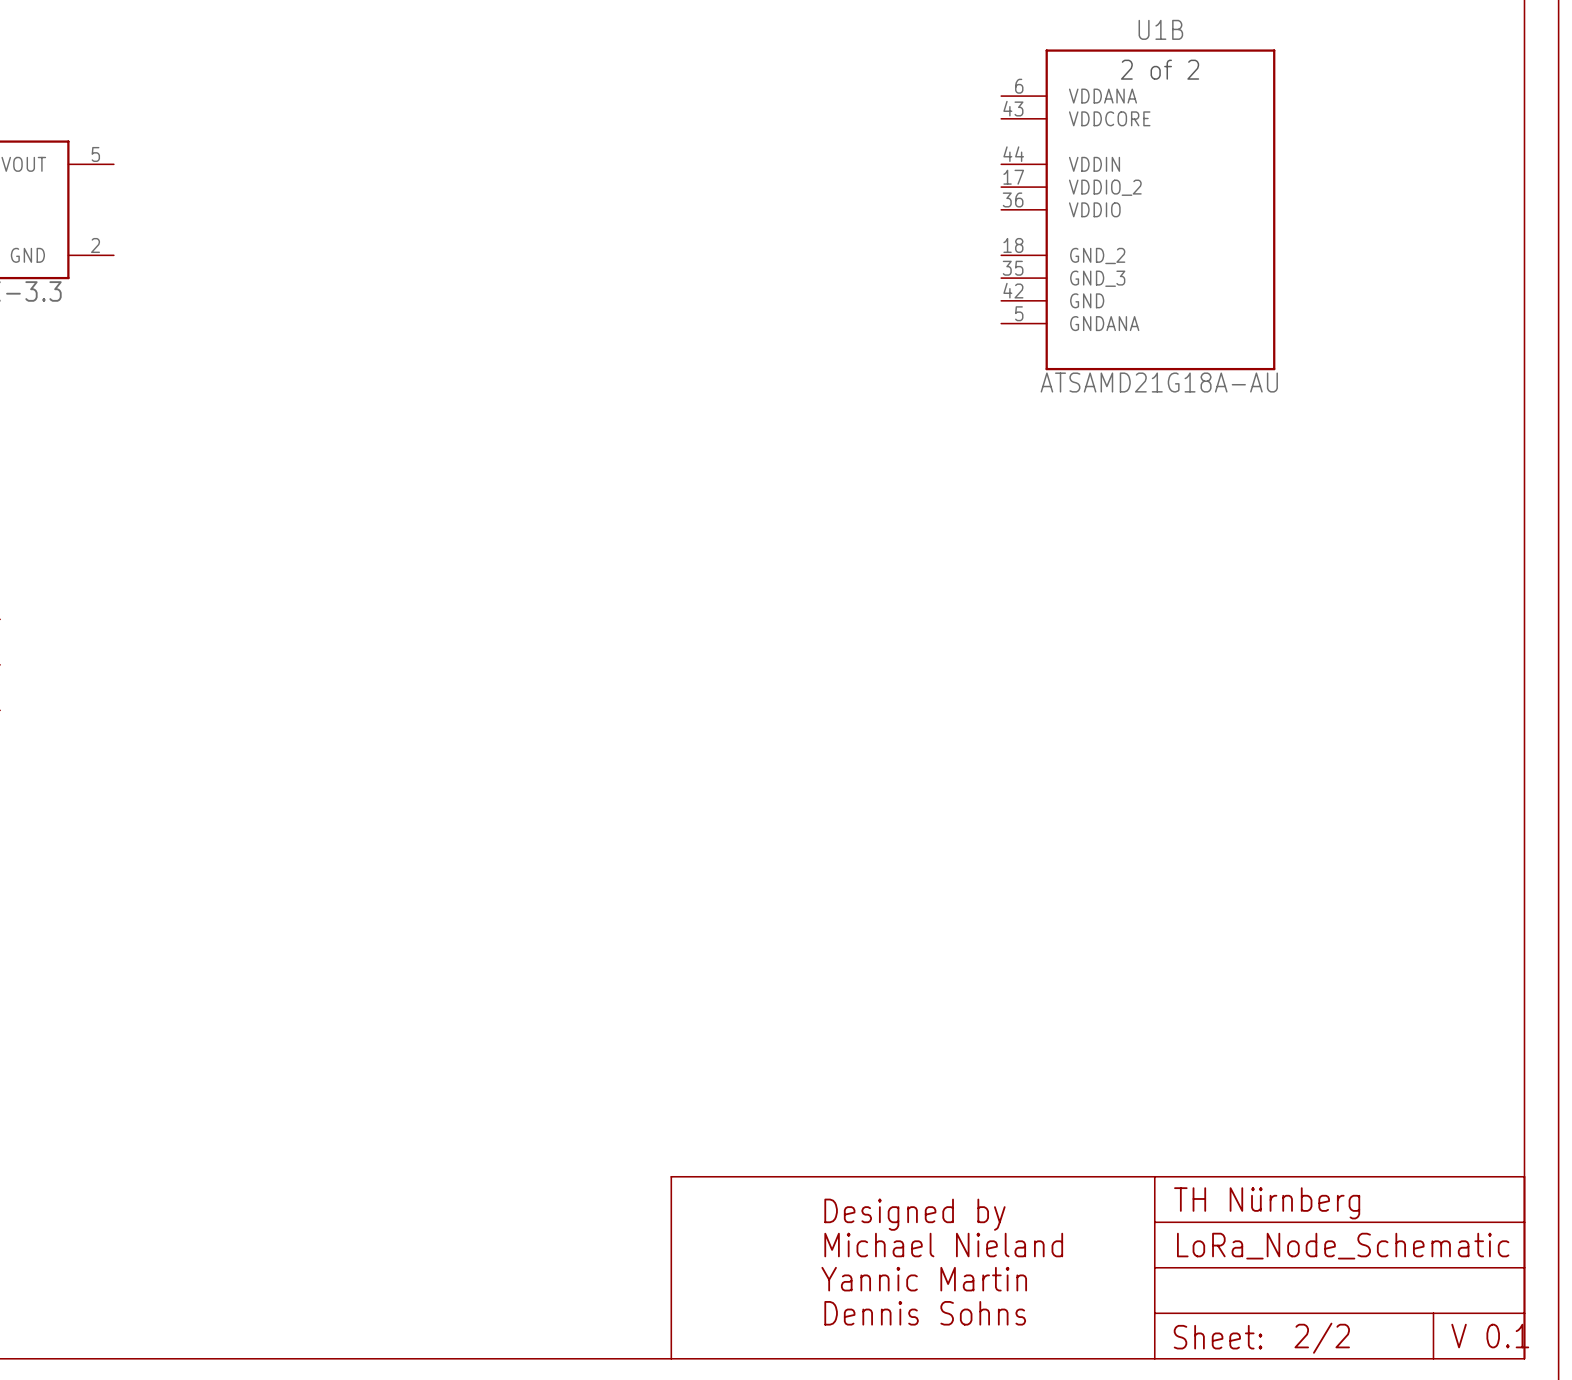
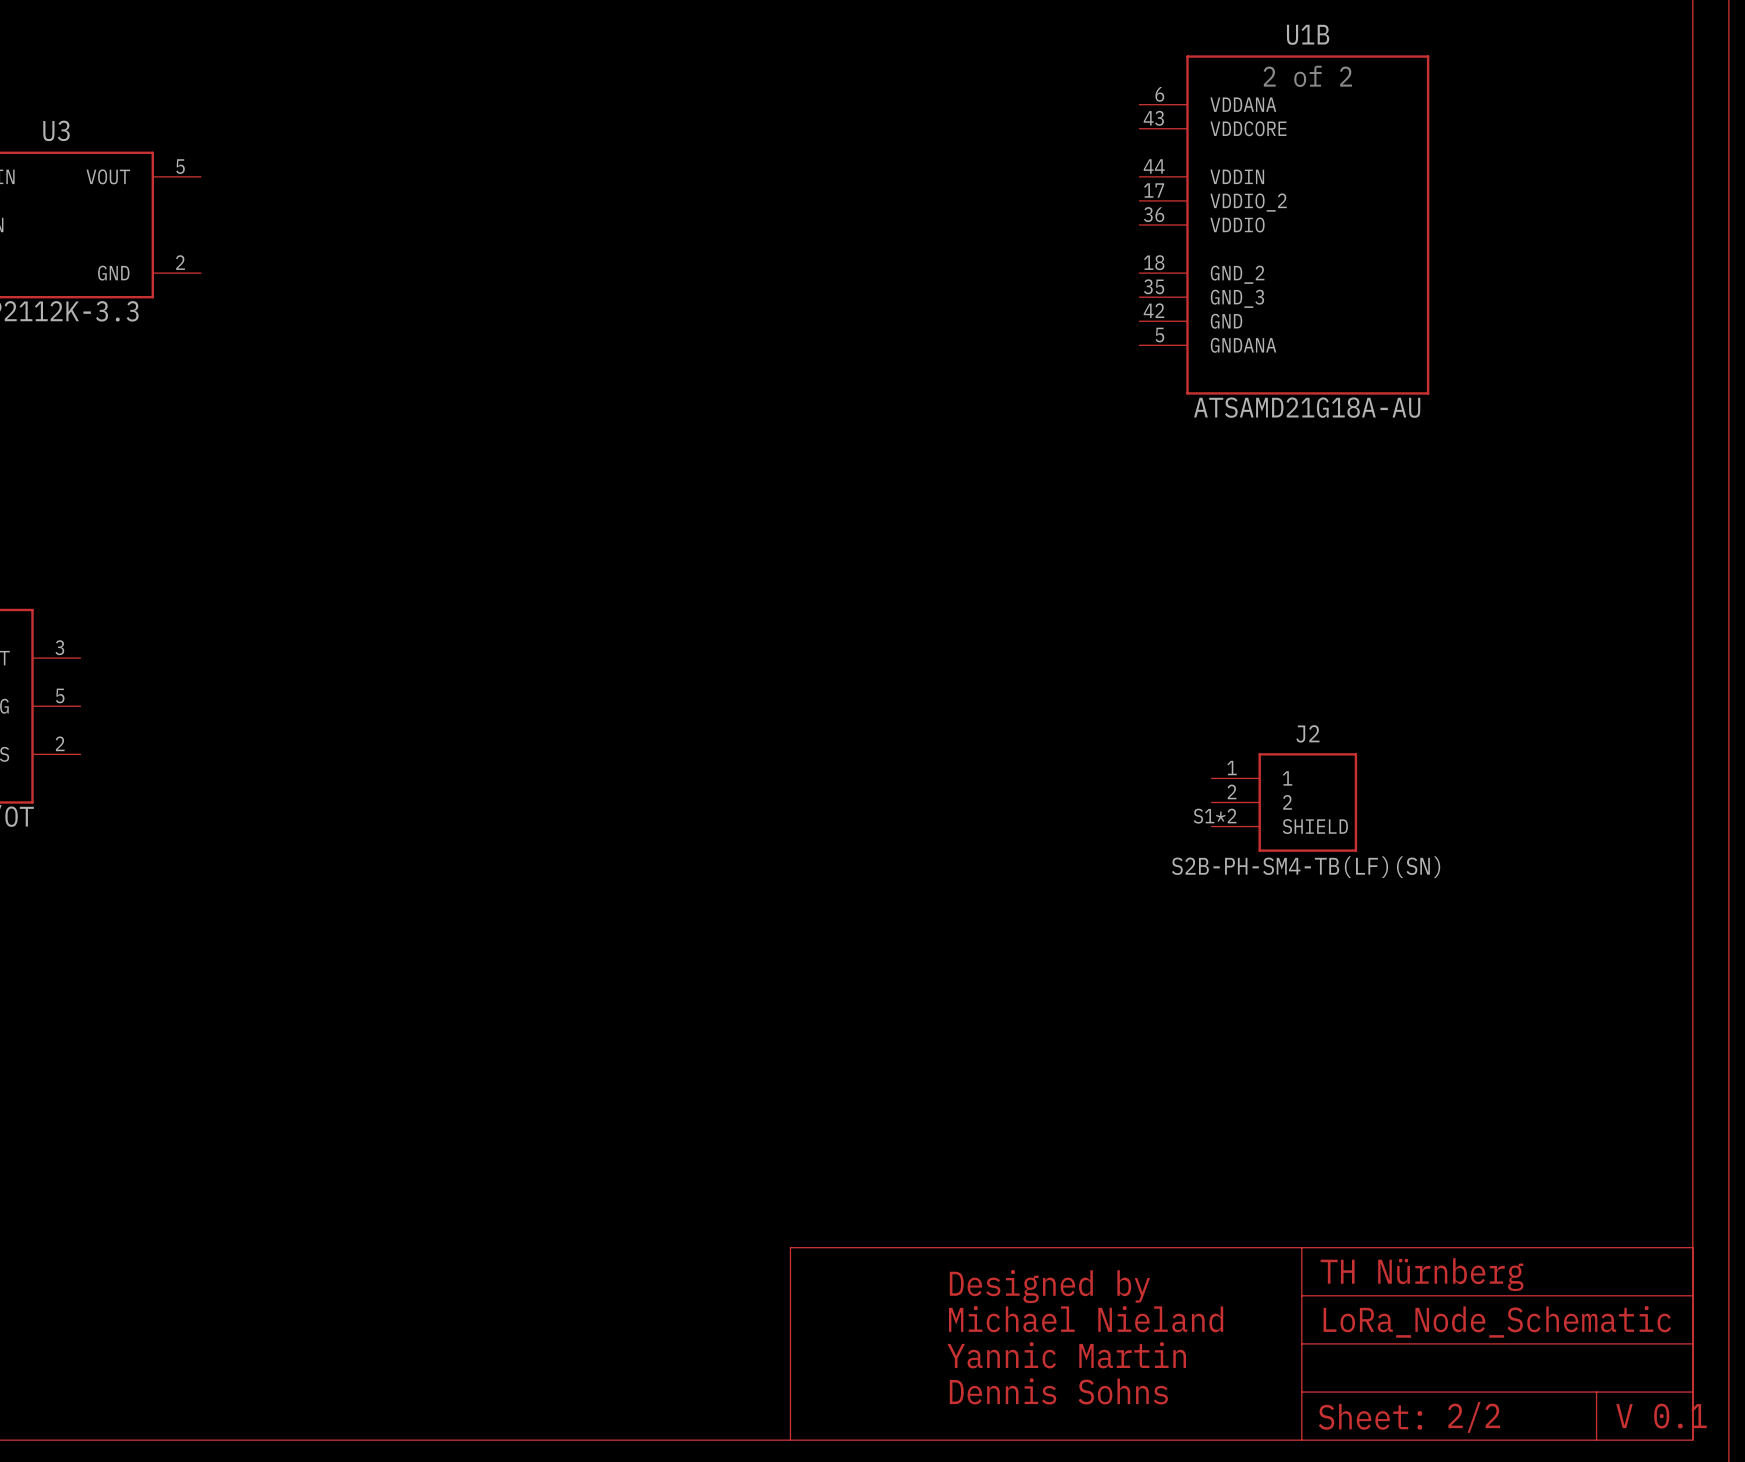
J2: none -> S2B-PH-SM4-TB(LF)(SN) (1284, 802)

